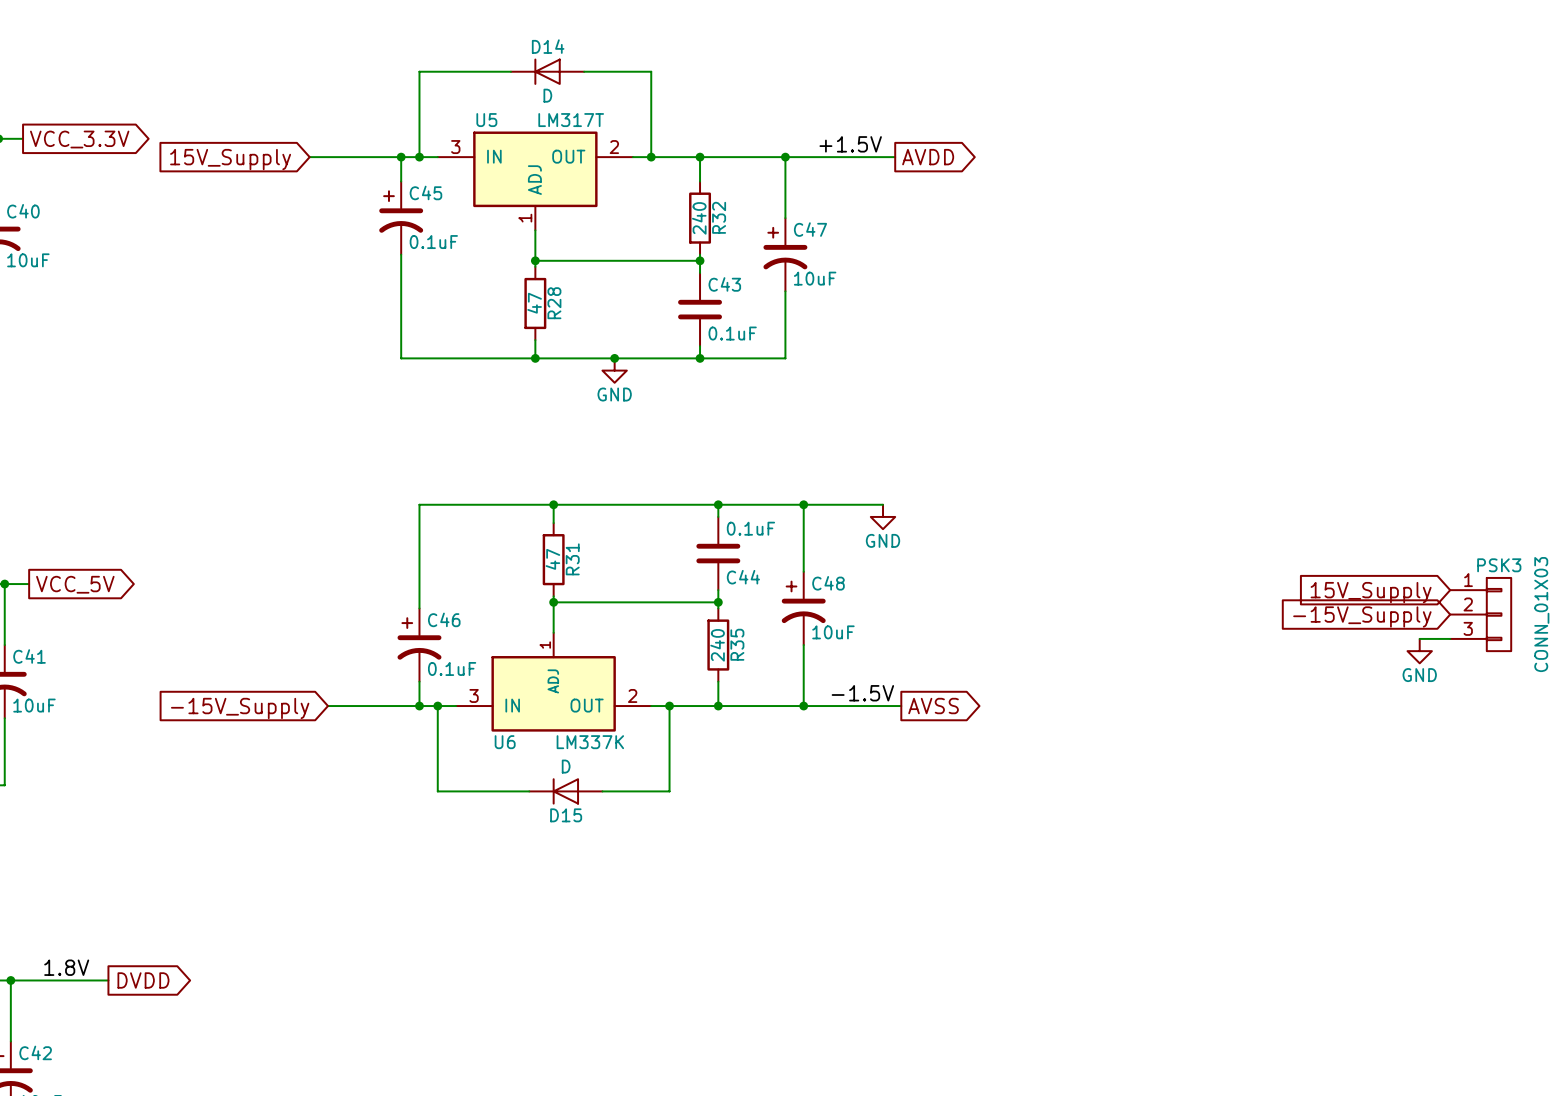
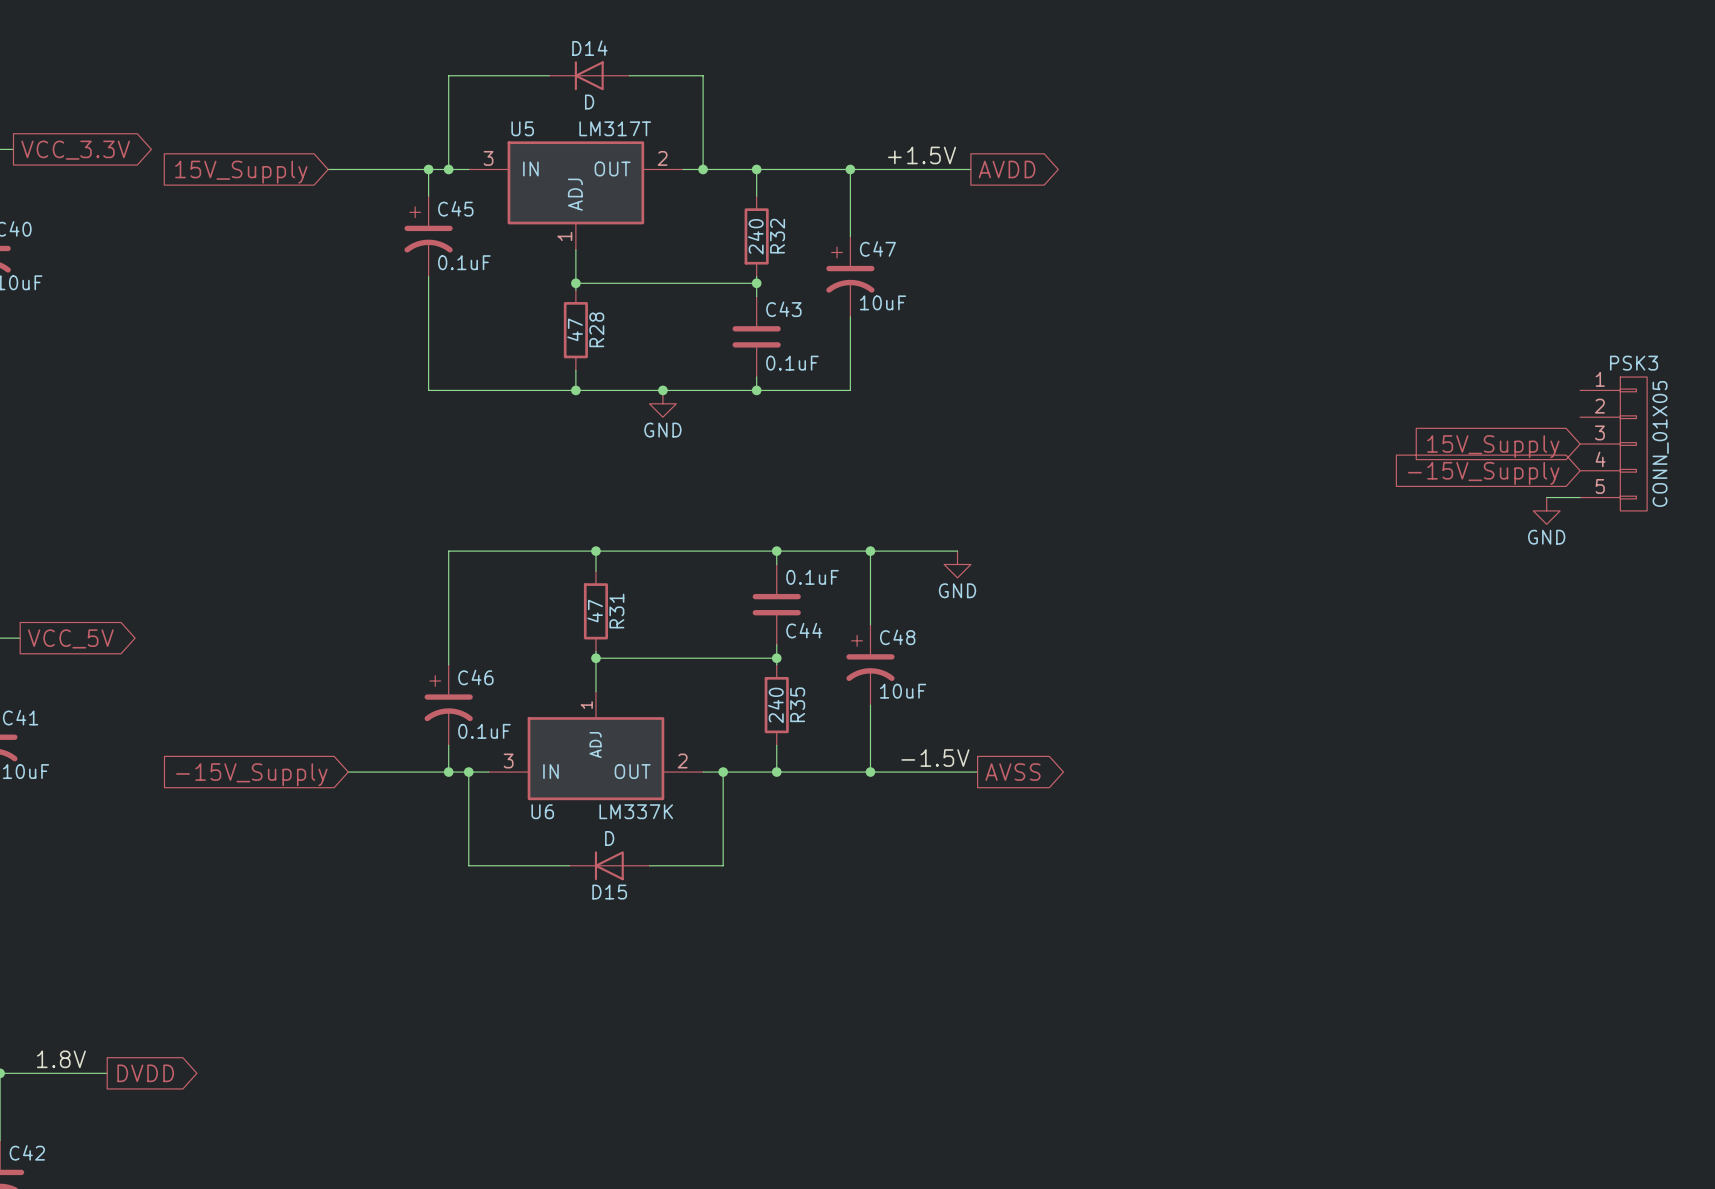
PSK3 name position: PSK3 (1499, 565) -> PSK3 (1634, 363)
PSK3 symbol: [1450, 577, 1512, 652] -> [1580, 377, 1648, 511]
global label position: 15V_Supply (1371, 592) -> 15V_Supply (1493, 446)
PSK3 value: CONN_01X03 (1541, 614) -> CONN_01X05 (1660, 443)
global label position: -15V_Supply (1362, 616) -> -15V_Supply (1483, 473)
wire: (1419, 638) (1450, 638) -> (1546, 497) (1580, 497)
power symbol position: GND (1419, 651) -> GND (1546, 510)

